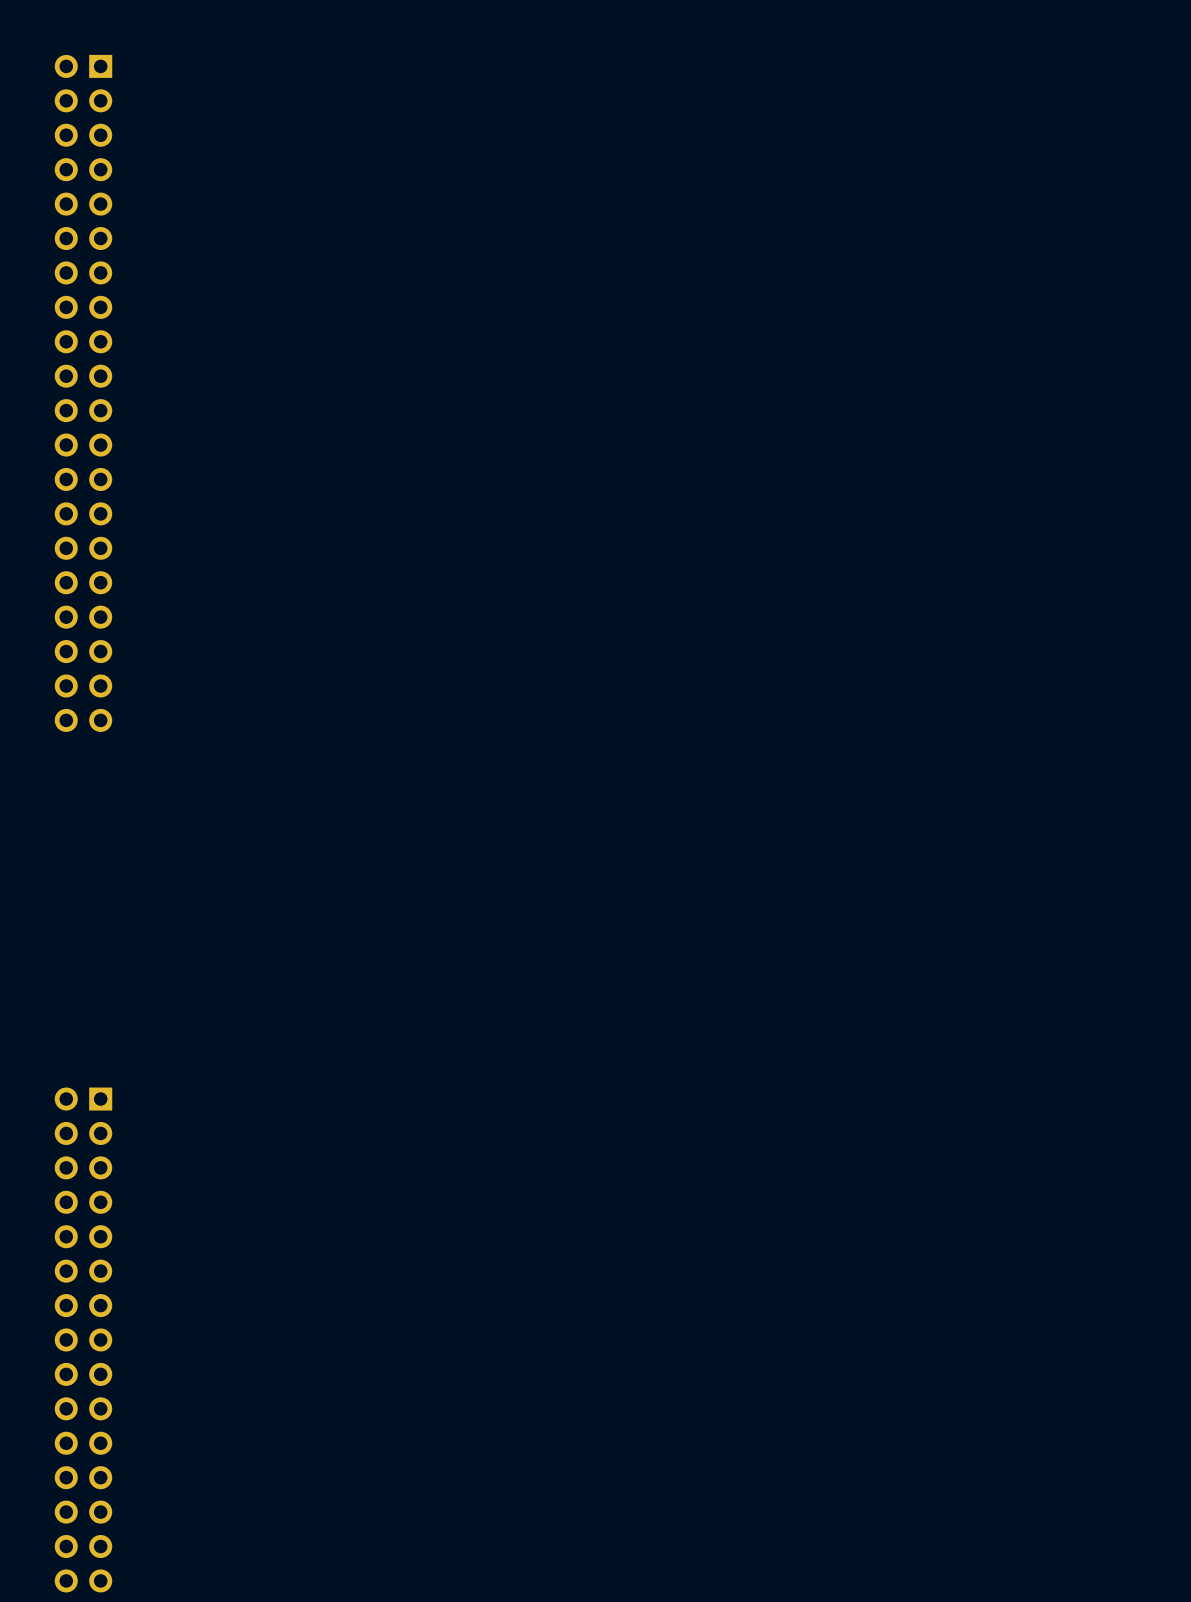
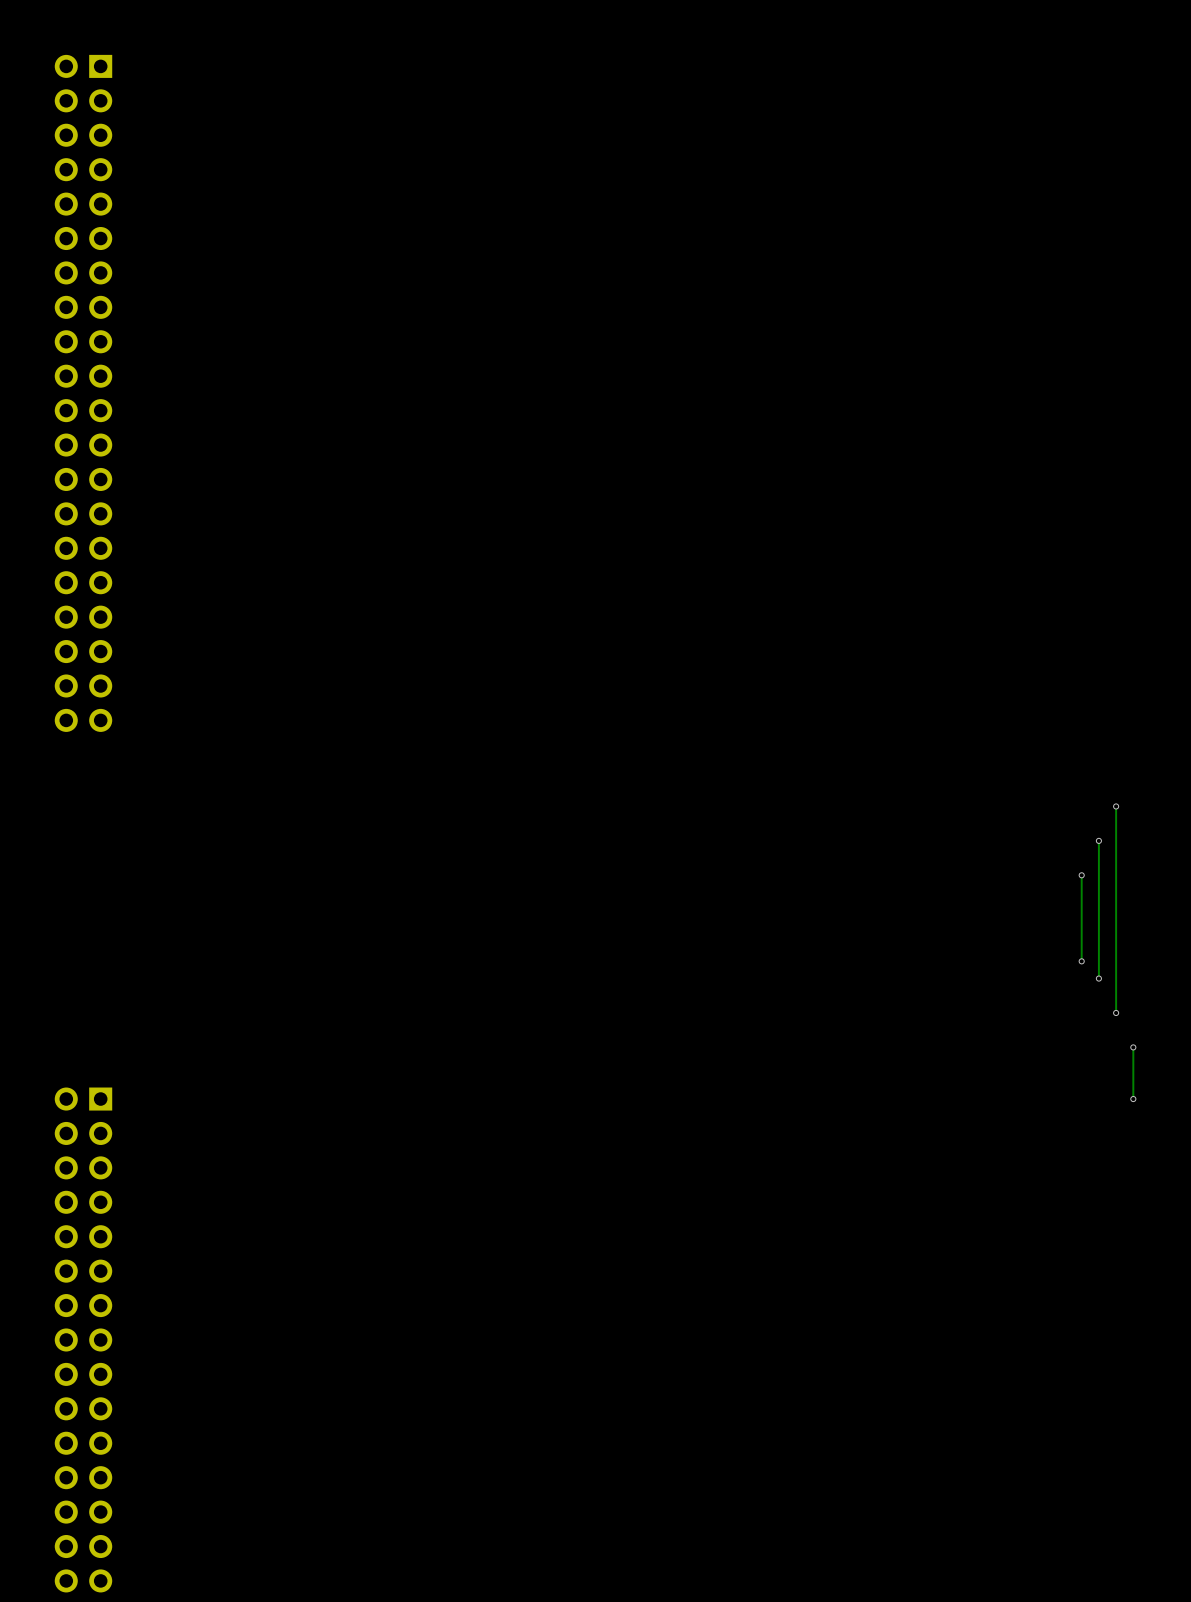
track: none -> (1116, 806) (1116, 1012)
via: none -> (1116, 806)
track: none -> (1098, 840) (1098, 978)
via: none -> (1098, 840)
track: none -> (1081, 875) (1081, 961)
via: none -> (1081, 875)
via: none -> (1081, 961)
via: none -> (1098, 978)
via: none -> (1116, 1012)
track: none -> (1133, 1047) (1133, 1099)
via: none -> (1133, 1047)
via: none -> (1133, 1099)

